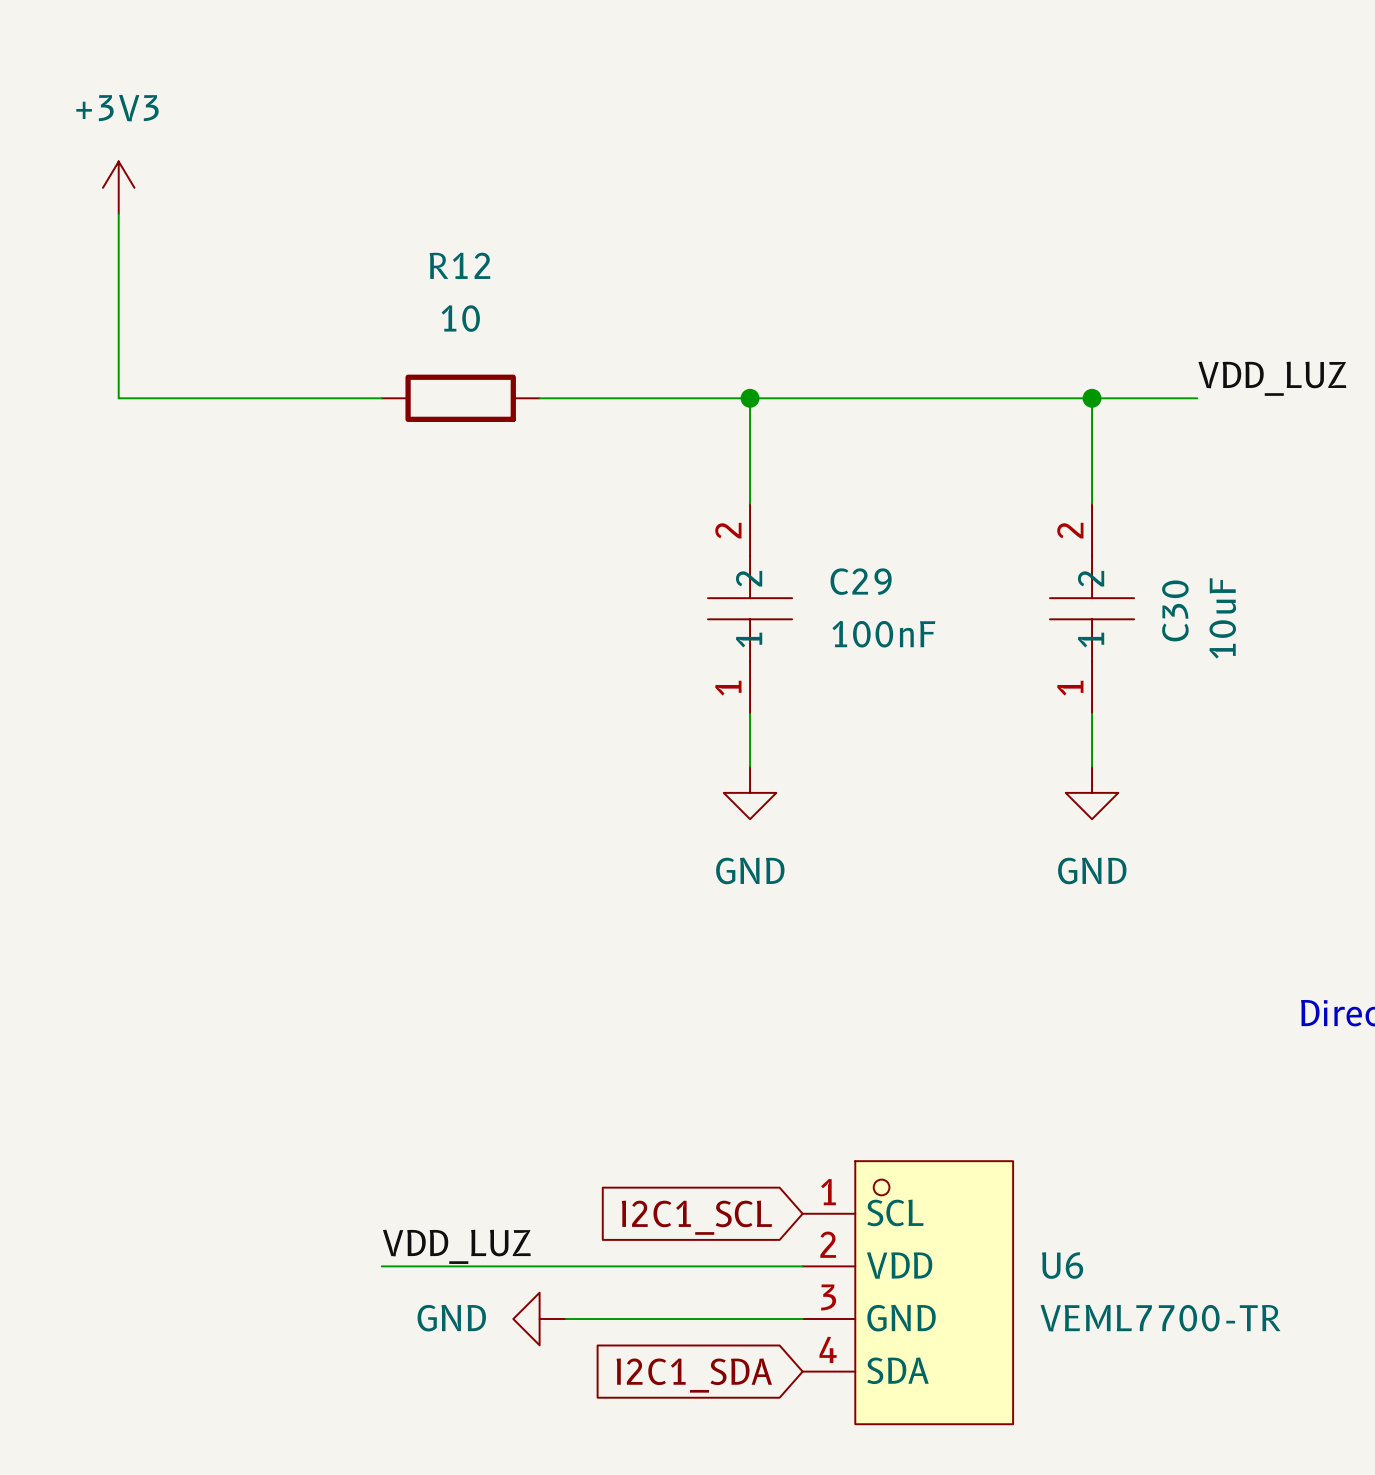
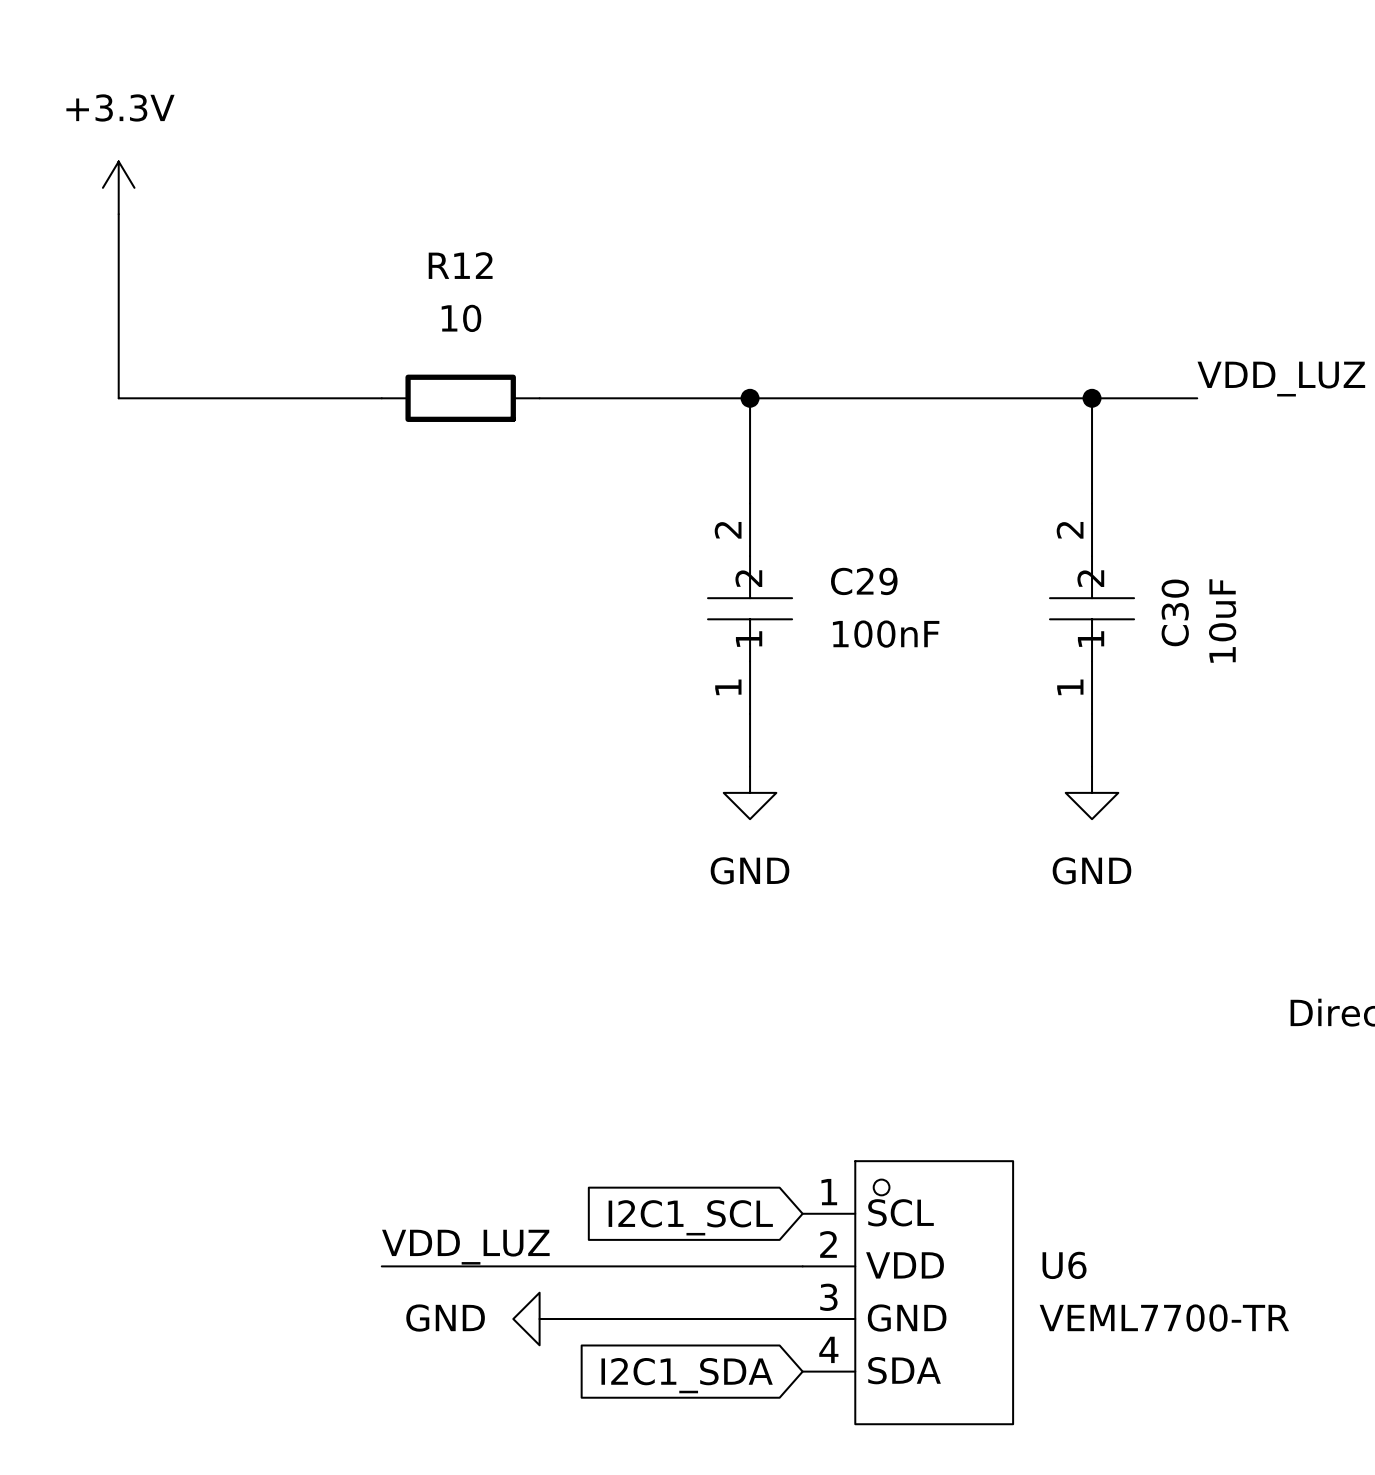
power symbol: +3V3 (118, 187) -> +3.3V (118, 187)

